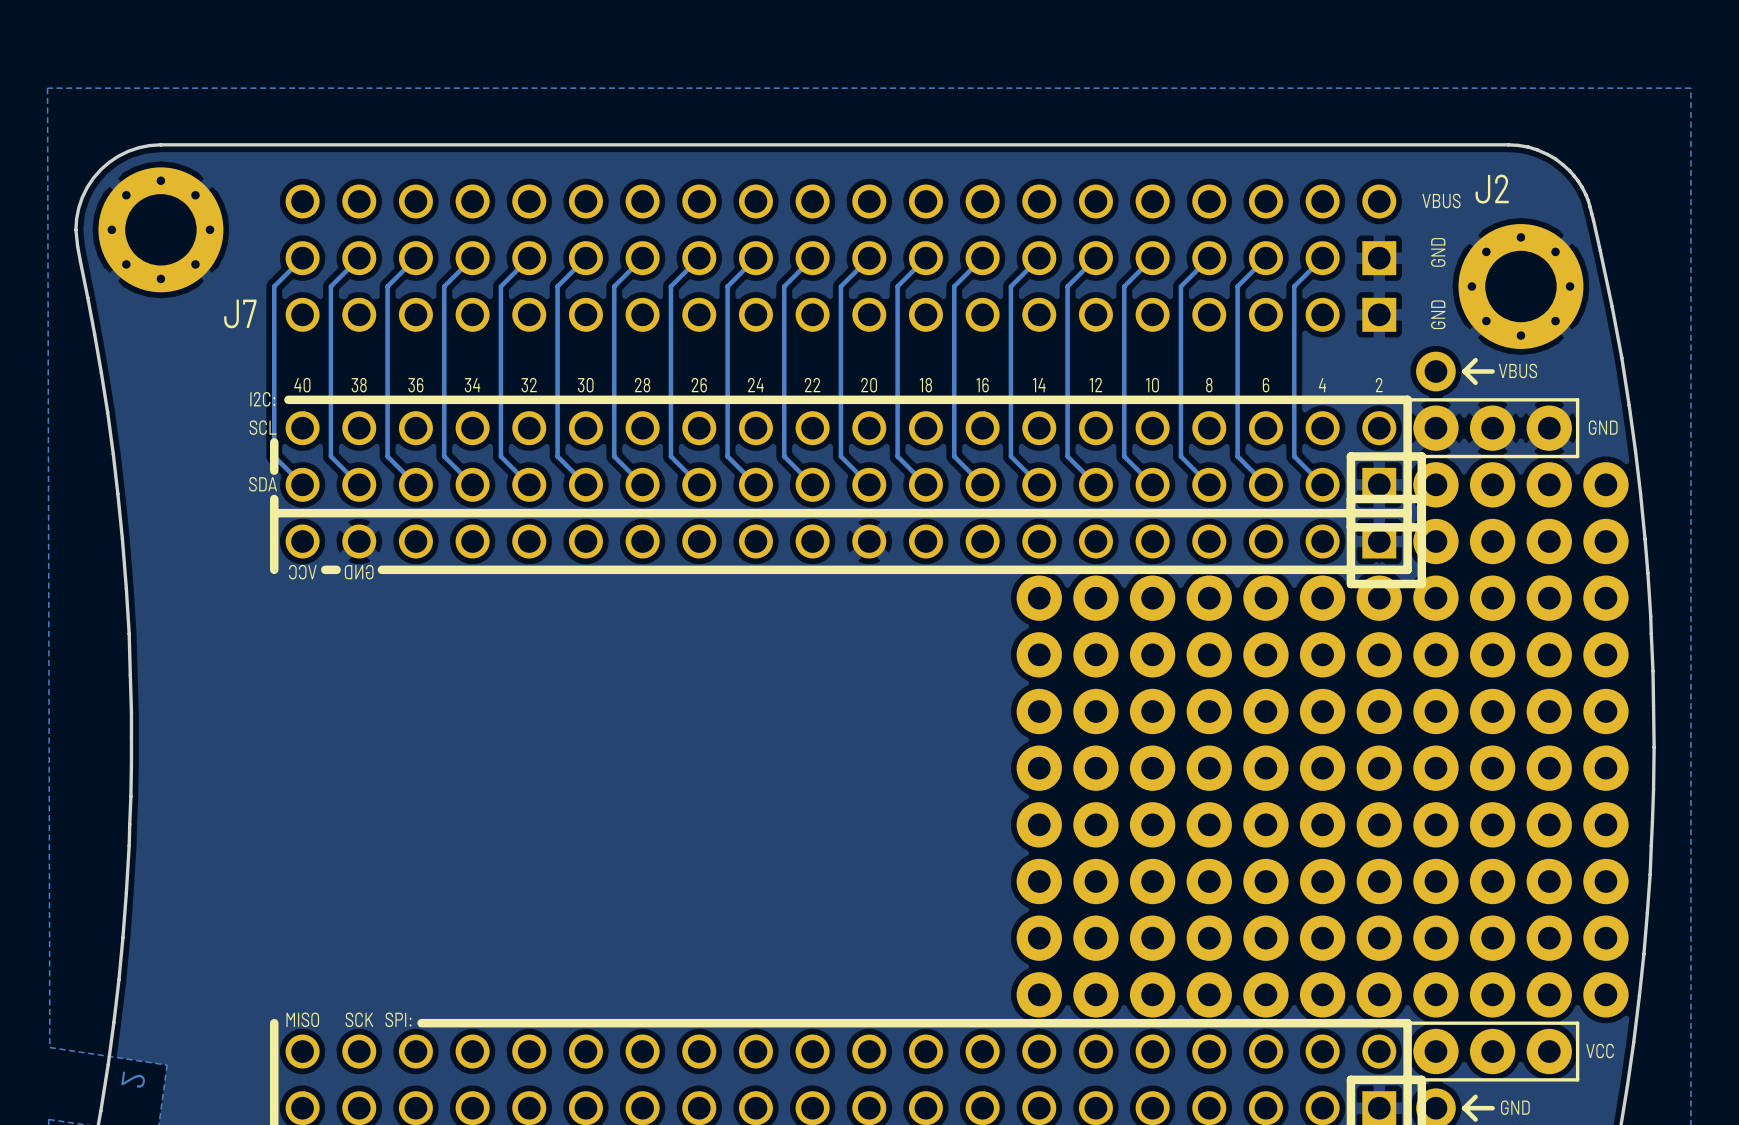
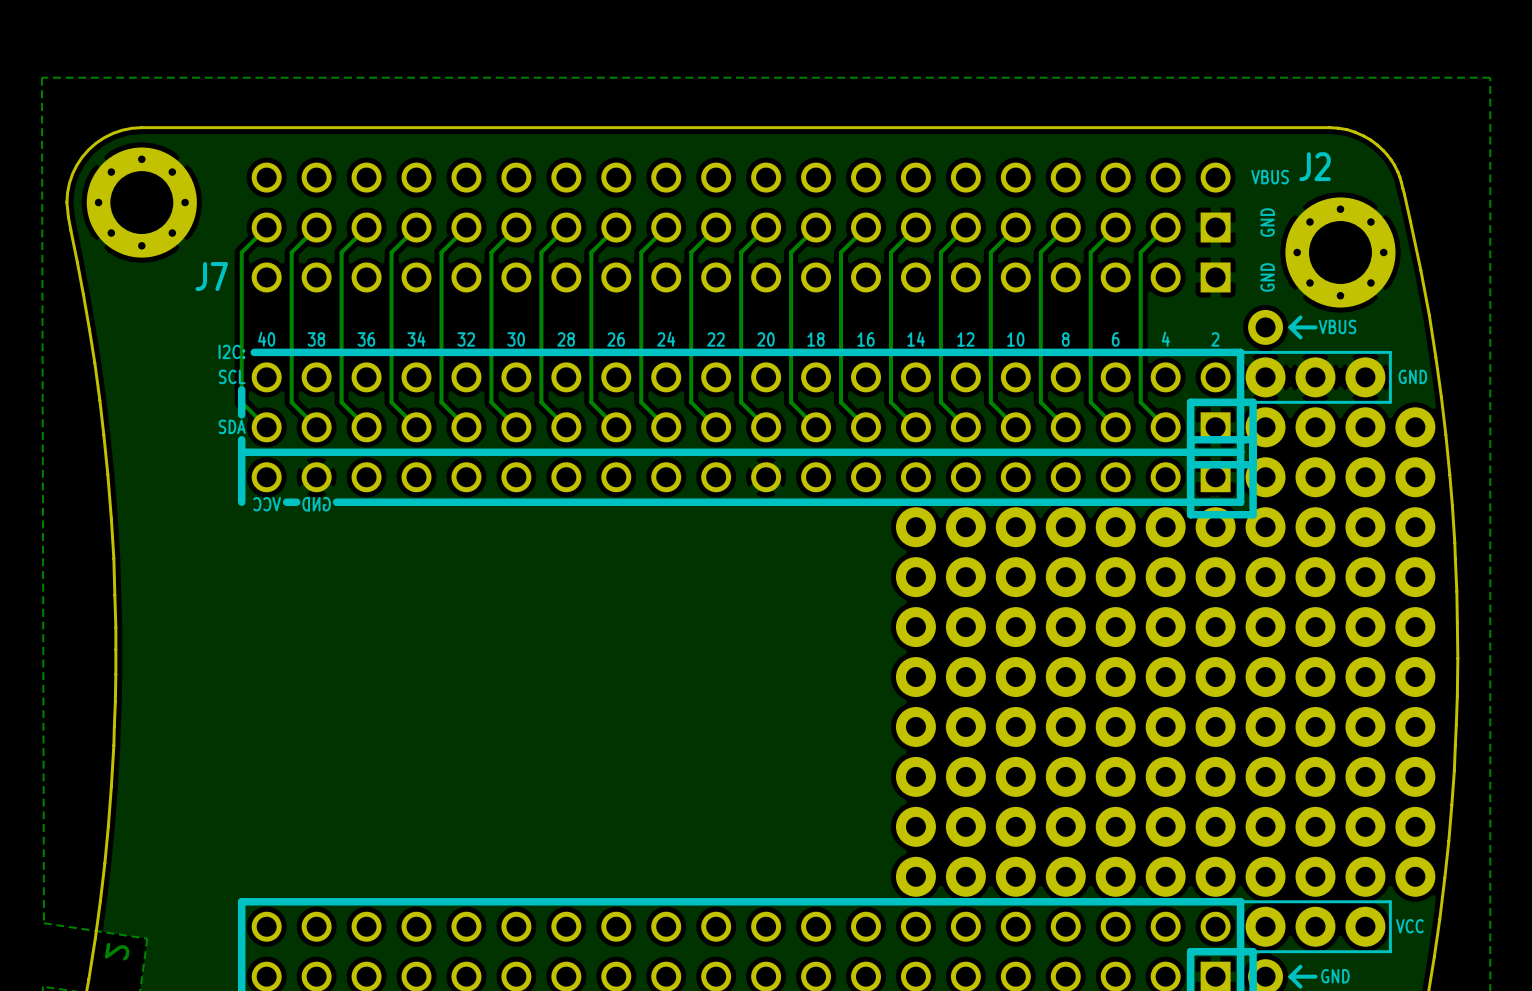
text: MISO (302, 1019) -> none
text: SCK (359, 1019) -> none
text: SPI: (398, 1019) -> none
line: none -> (371, 901) (241, 901)

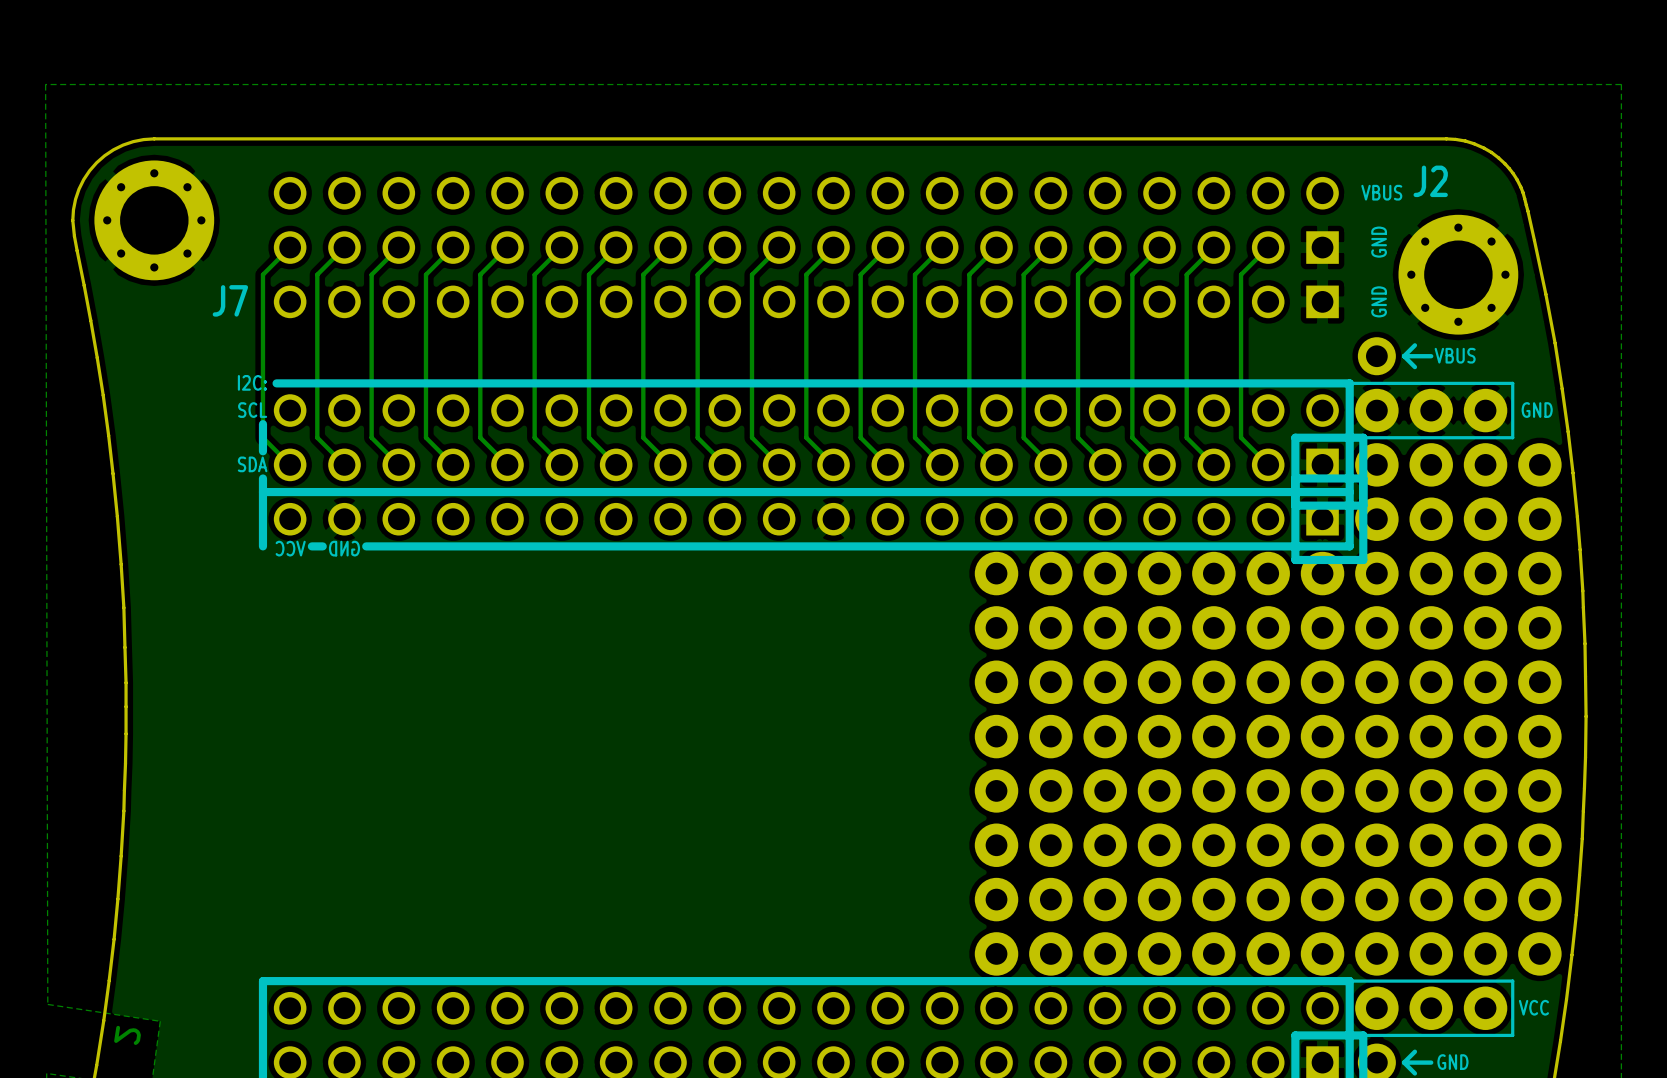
text: 40 (266, 339) -> none
text: 38 (316, 339) -> none
text: 36 (366, 339) -> none
text: 34 (416, 339) -> none
text: 32 (466, 339) -> none
text: 30 (516, 339) -> none
text: 28 (566, 339) -> none
text: 26 (616, 339) -> none
text: 24 (666, 339) -> none
text: 22 (715, 339) -> none
text: 20 (765, 339) -> none
text: 18 (816, 339) -> none
text: 16 (866, 339) -> none
text: 14 (916, 339) -> none
text: 12 (965, 339) -> none
text: 10 (1015, 339) -> none
text: 8 (1065, 339) -> none
text: 6 (1115, 339) -> none
text: 4 (1165, 339) -> none
text: 2 (1215, 339) -> none

